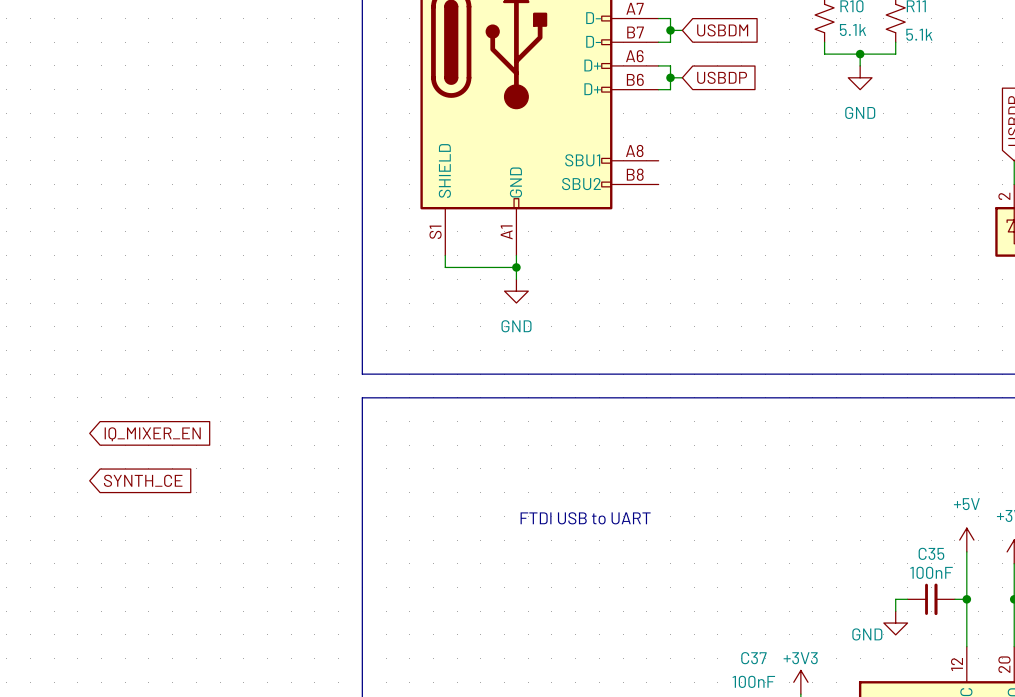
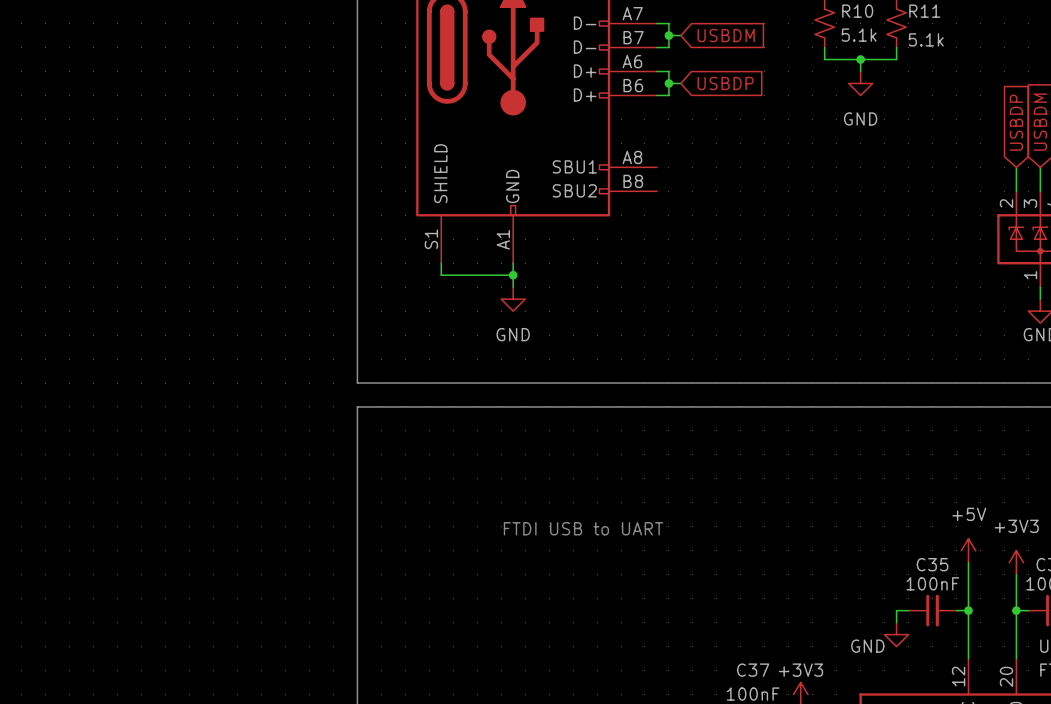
global label: IQ_MIXER_EN (152, 434) -> none
global label: SYNTH_CE (143, 480) -> none

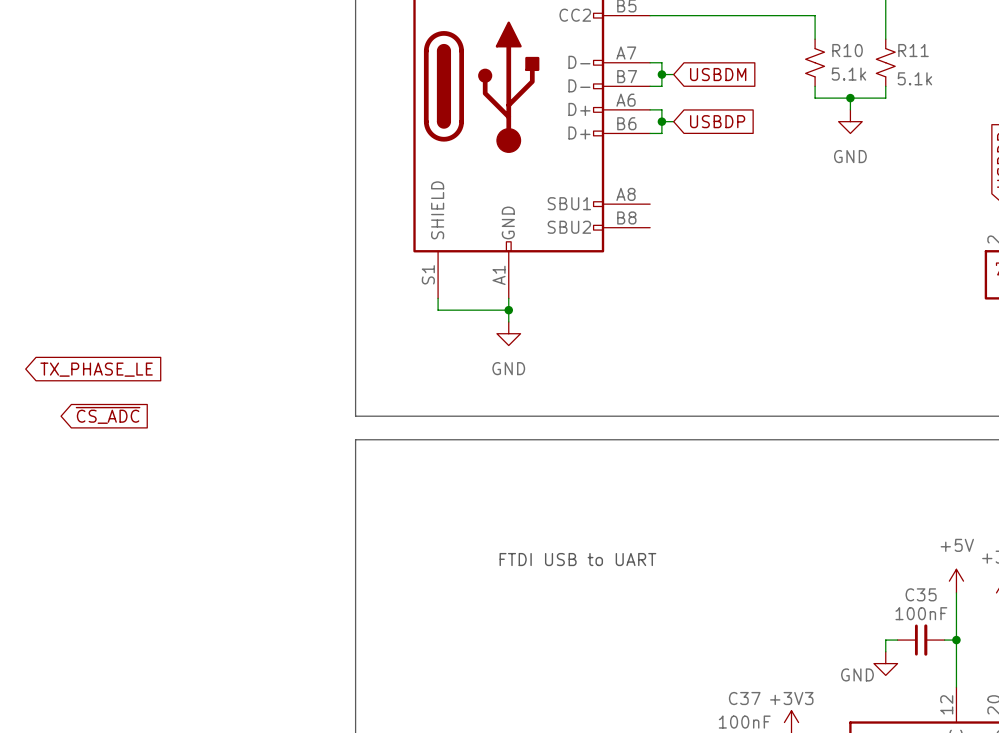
global label: none -> TX_PHASE_LE (96, 369)
global label: none -> ~{CS_ADC} (108, 415)

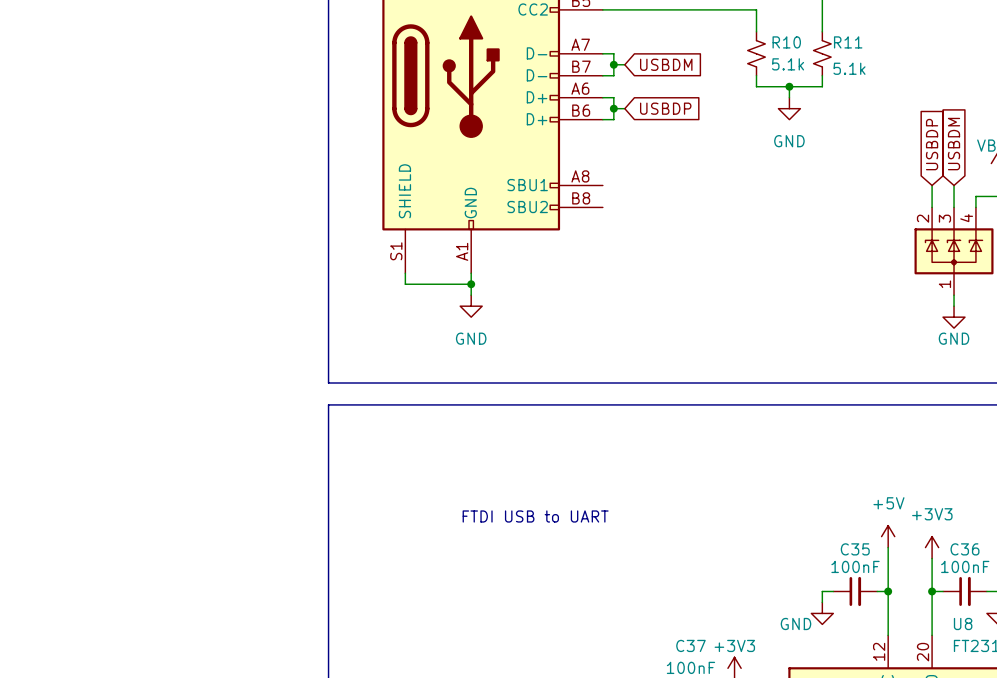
global label: TX_PHASE_LE (96, 369) -> none
global label: ~{CS_ADC} (108, 415) -> none

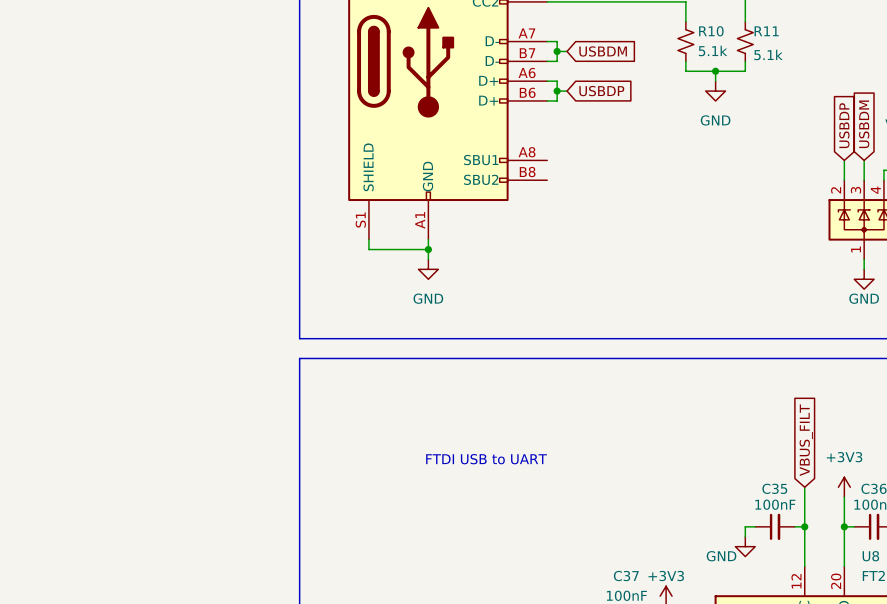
global label: none -> VBUS_FILT (806, 440)
power symbol: +5V (888, 536) -> none

